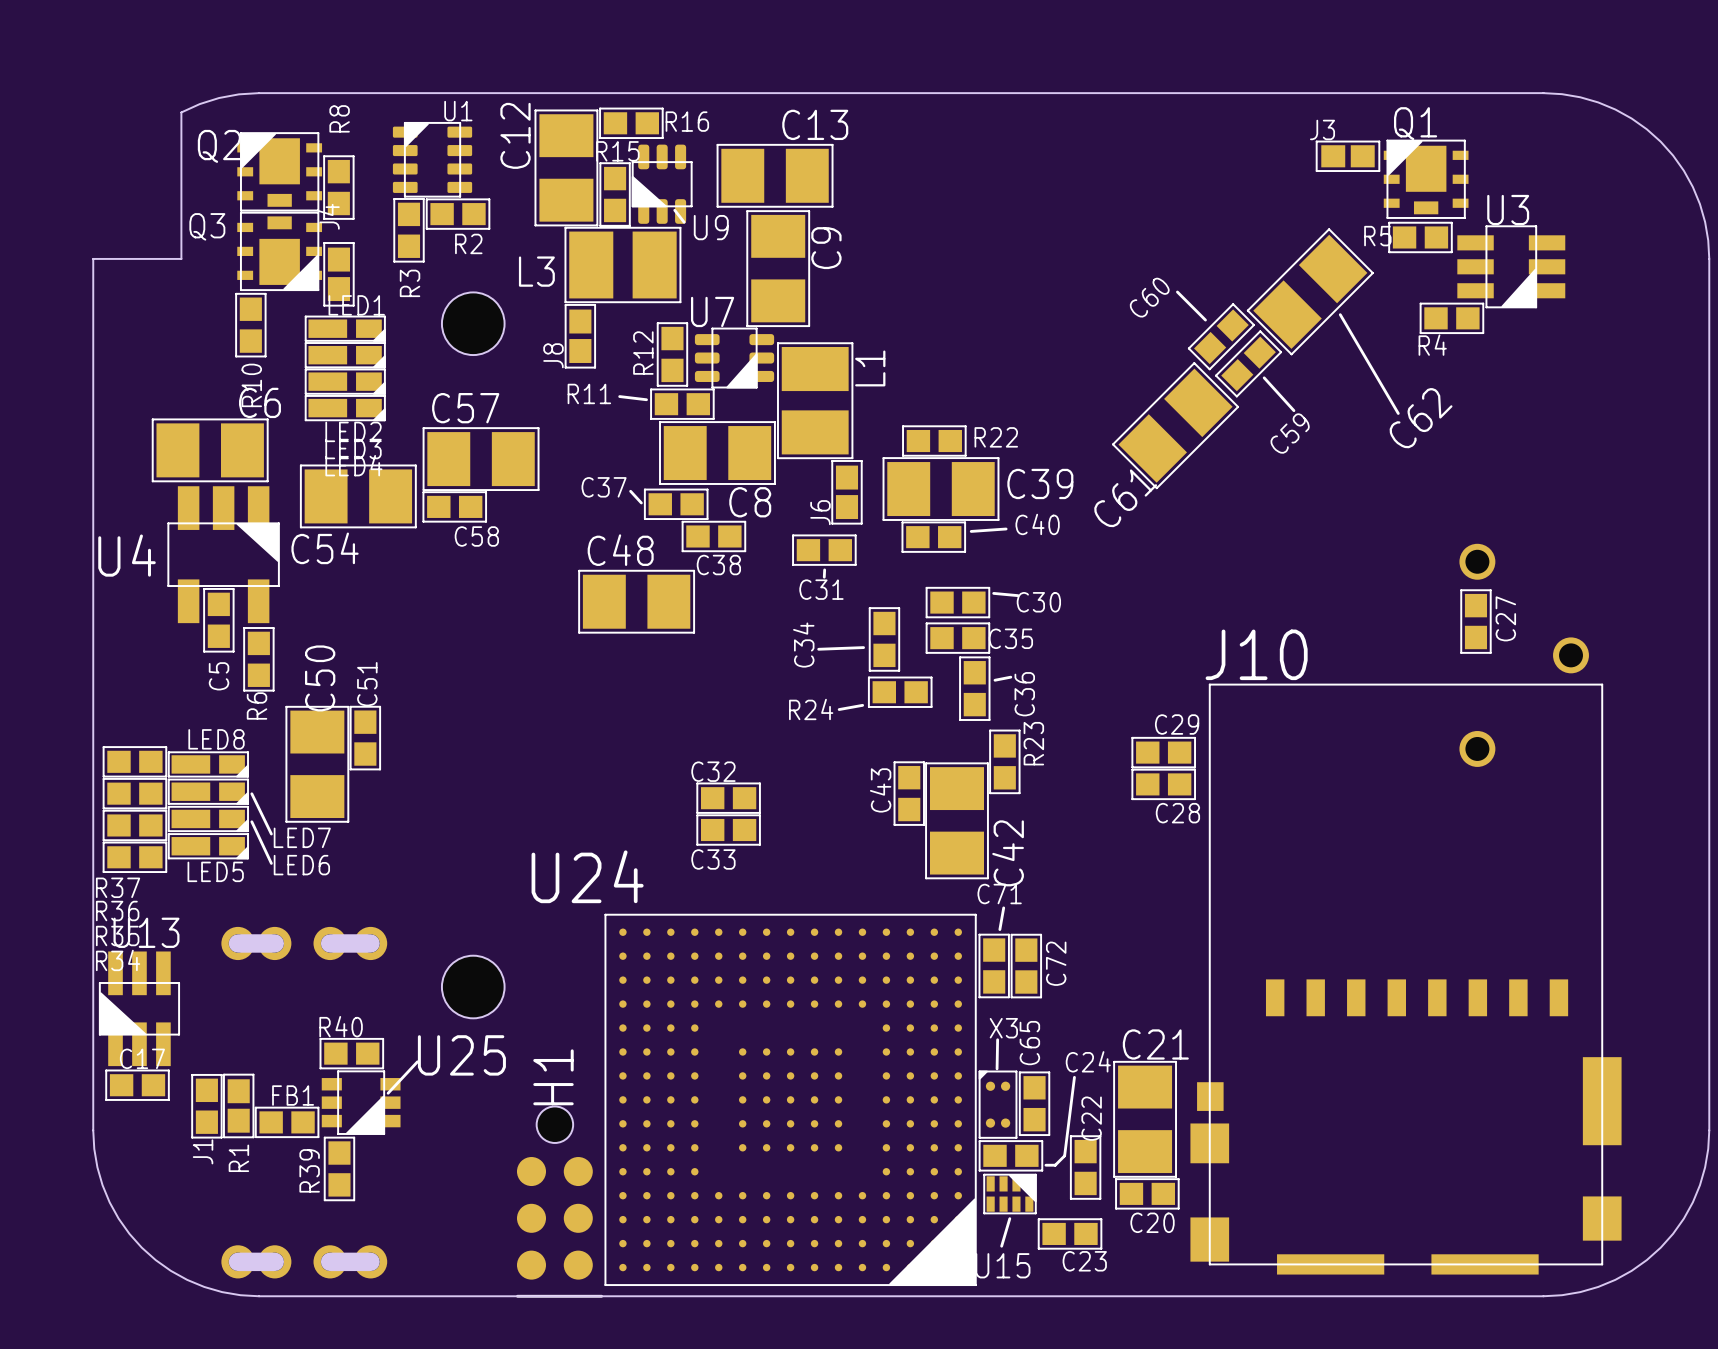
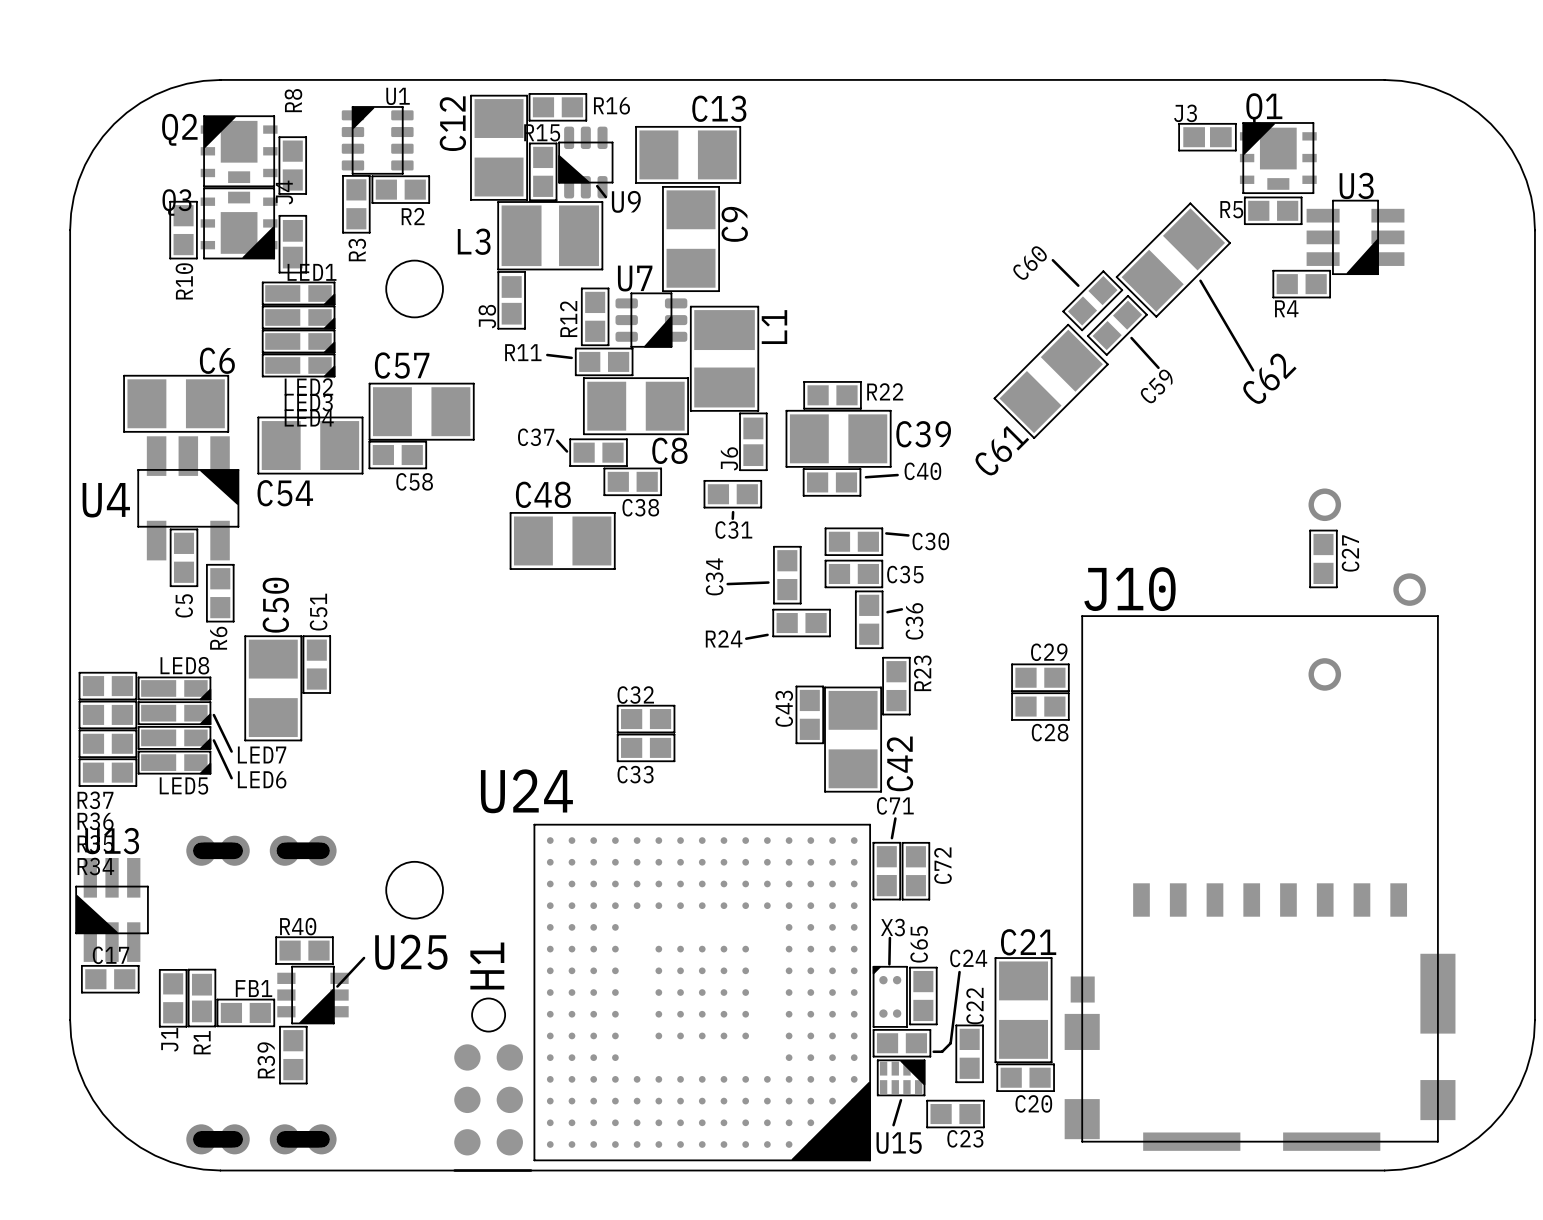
board edge: (259, 93) (219, 98) (181, 112) (181, 258) (93, 258) -> (220, 79) (187, 83) (155, 94) (140, 103) (114, 123) (93, 150) (85, 165) (73, 196) (70, 230)
R10 position: (250, 325) -> (183, 230)

